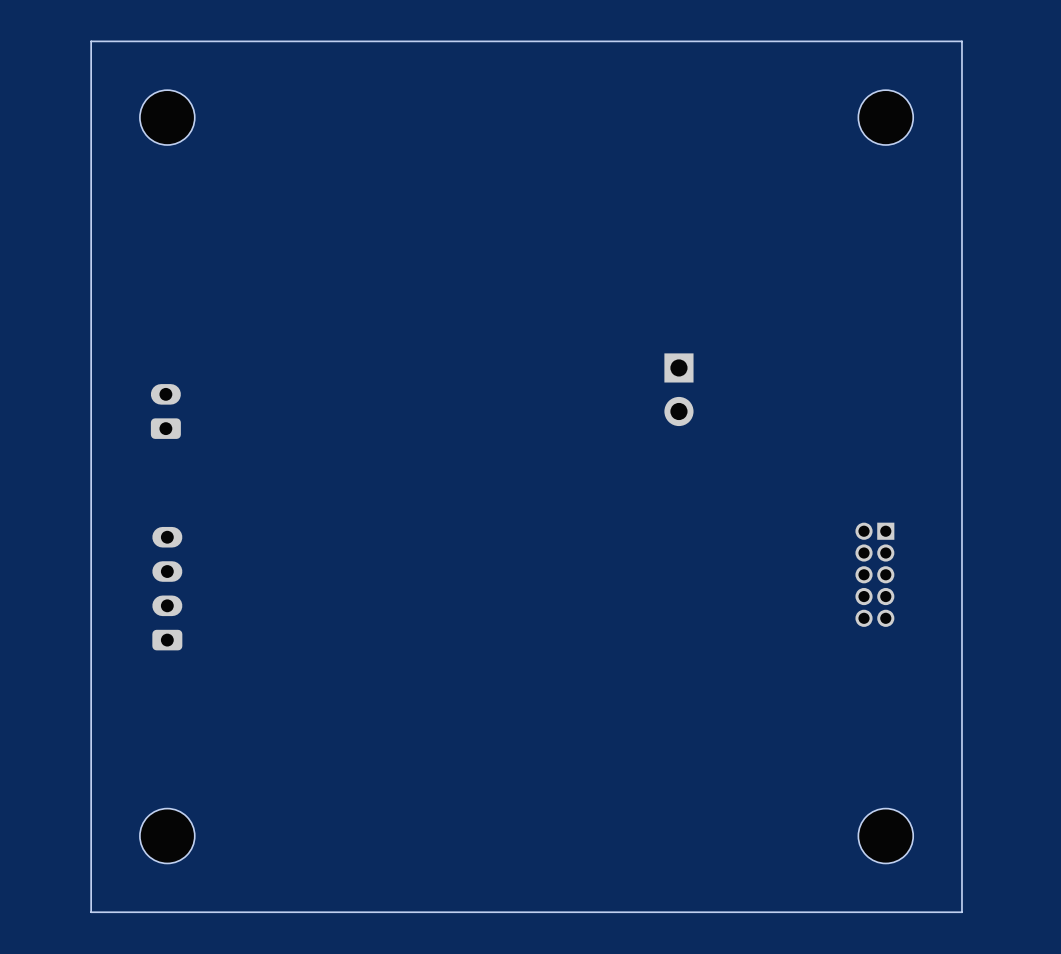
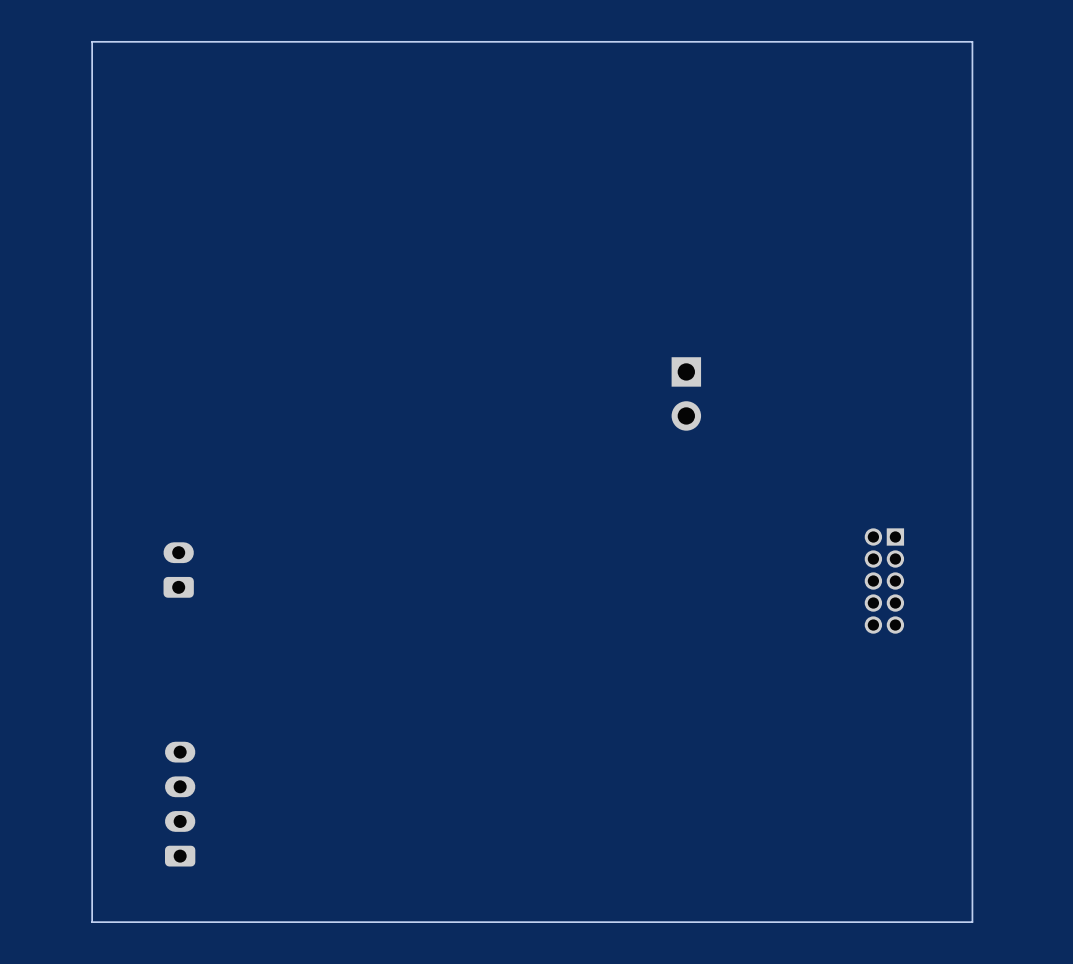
part: (167, 117) -> none
part: (885, 117) -> none
part position: (165, 411) -> (178, 570)
part position: (167, 588) -> (180, 804)
part: (167, 836) -> none
part: (885, 836) -> none

